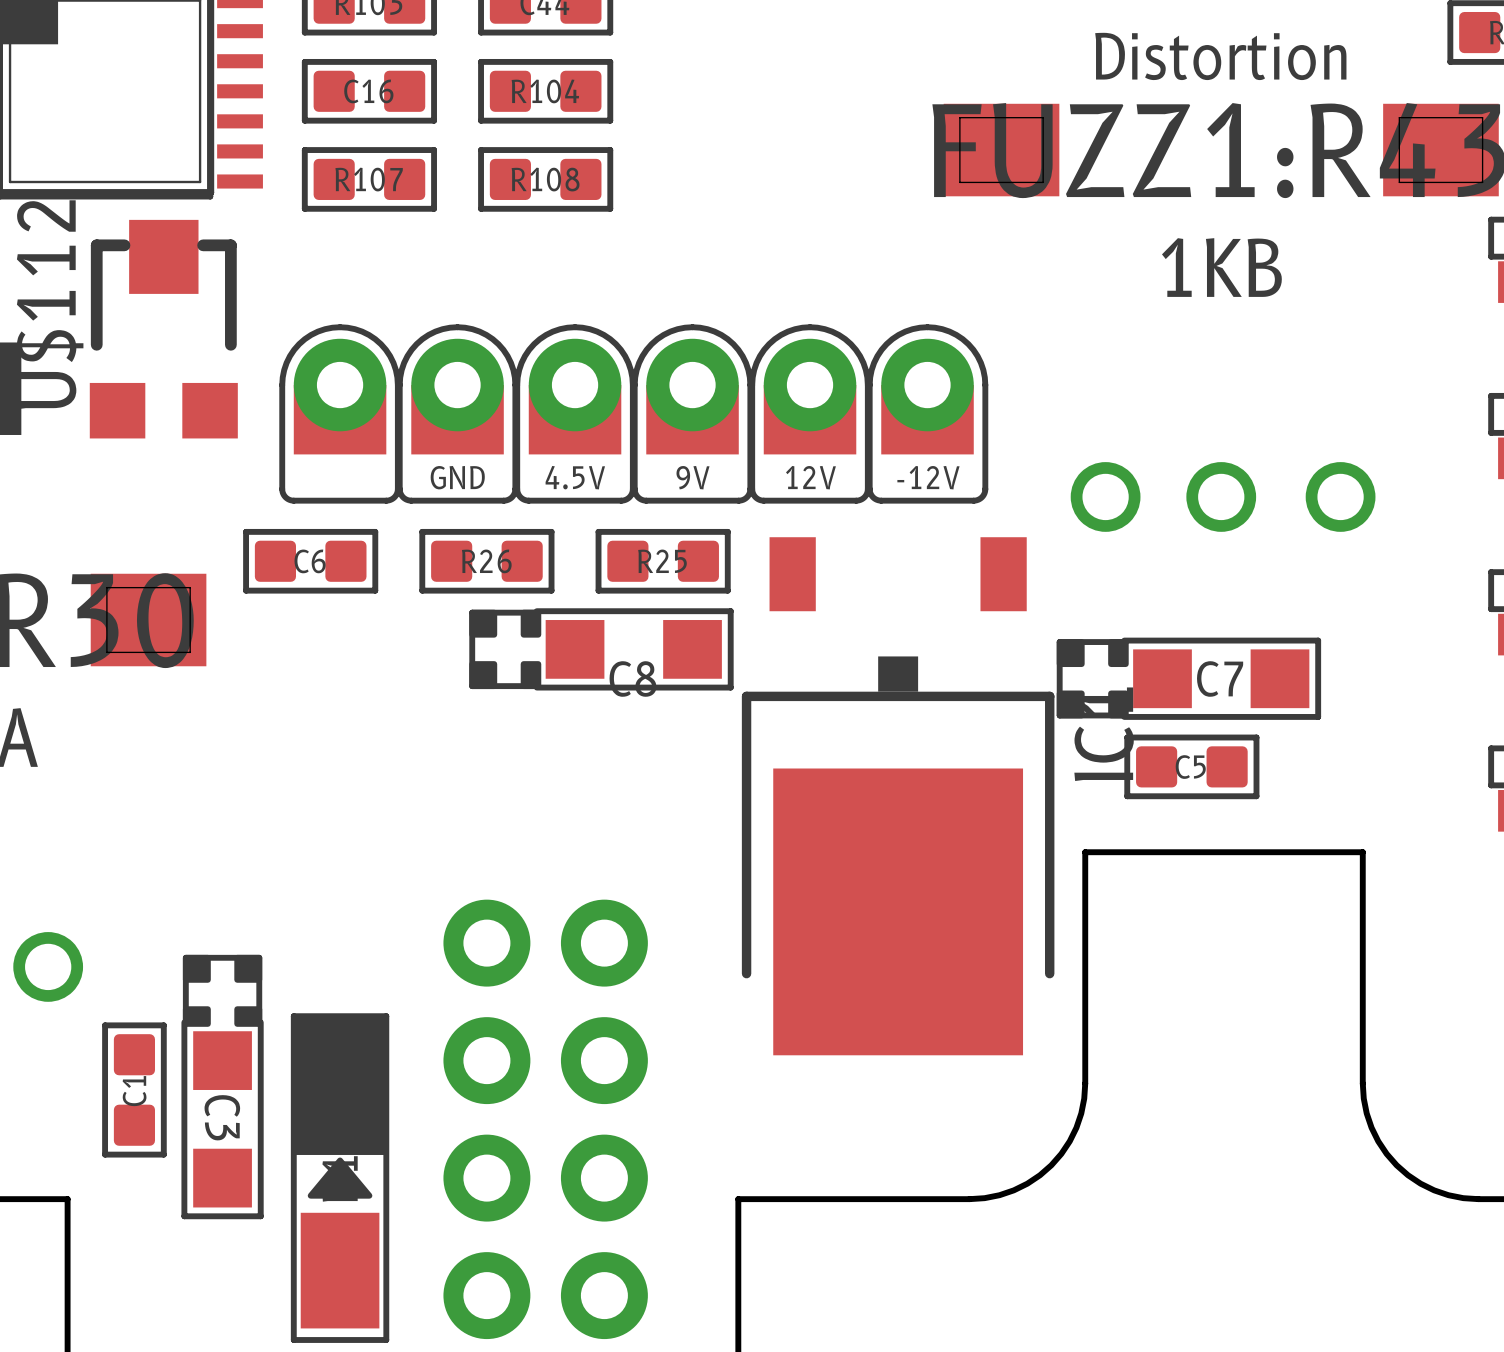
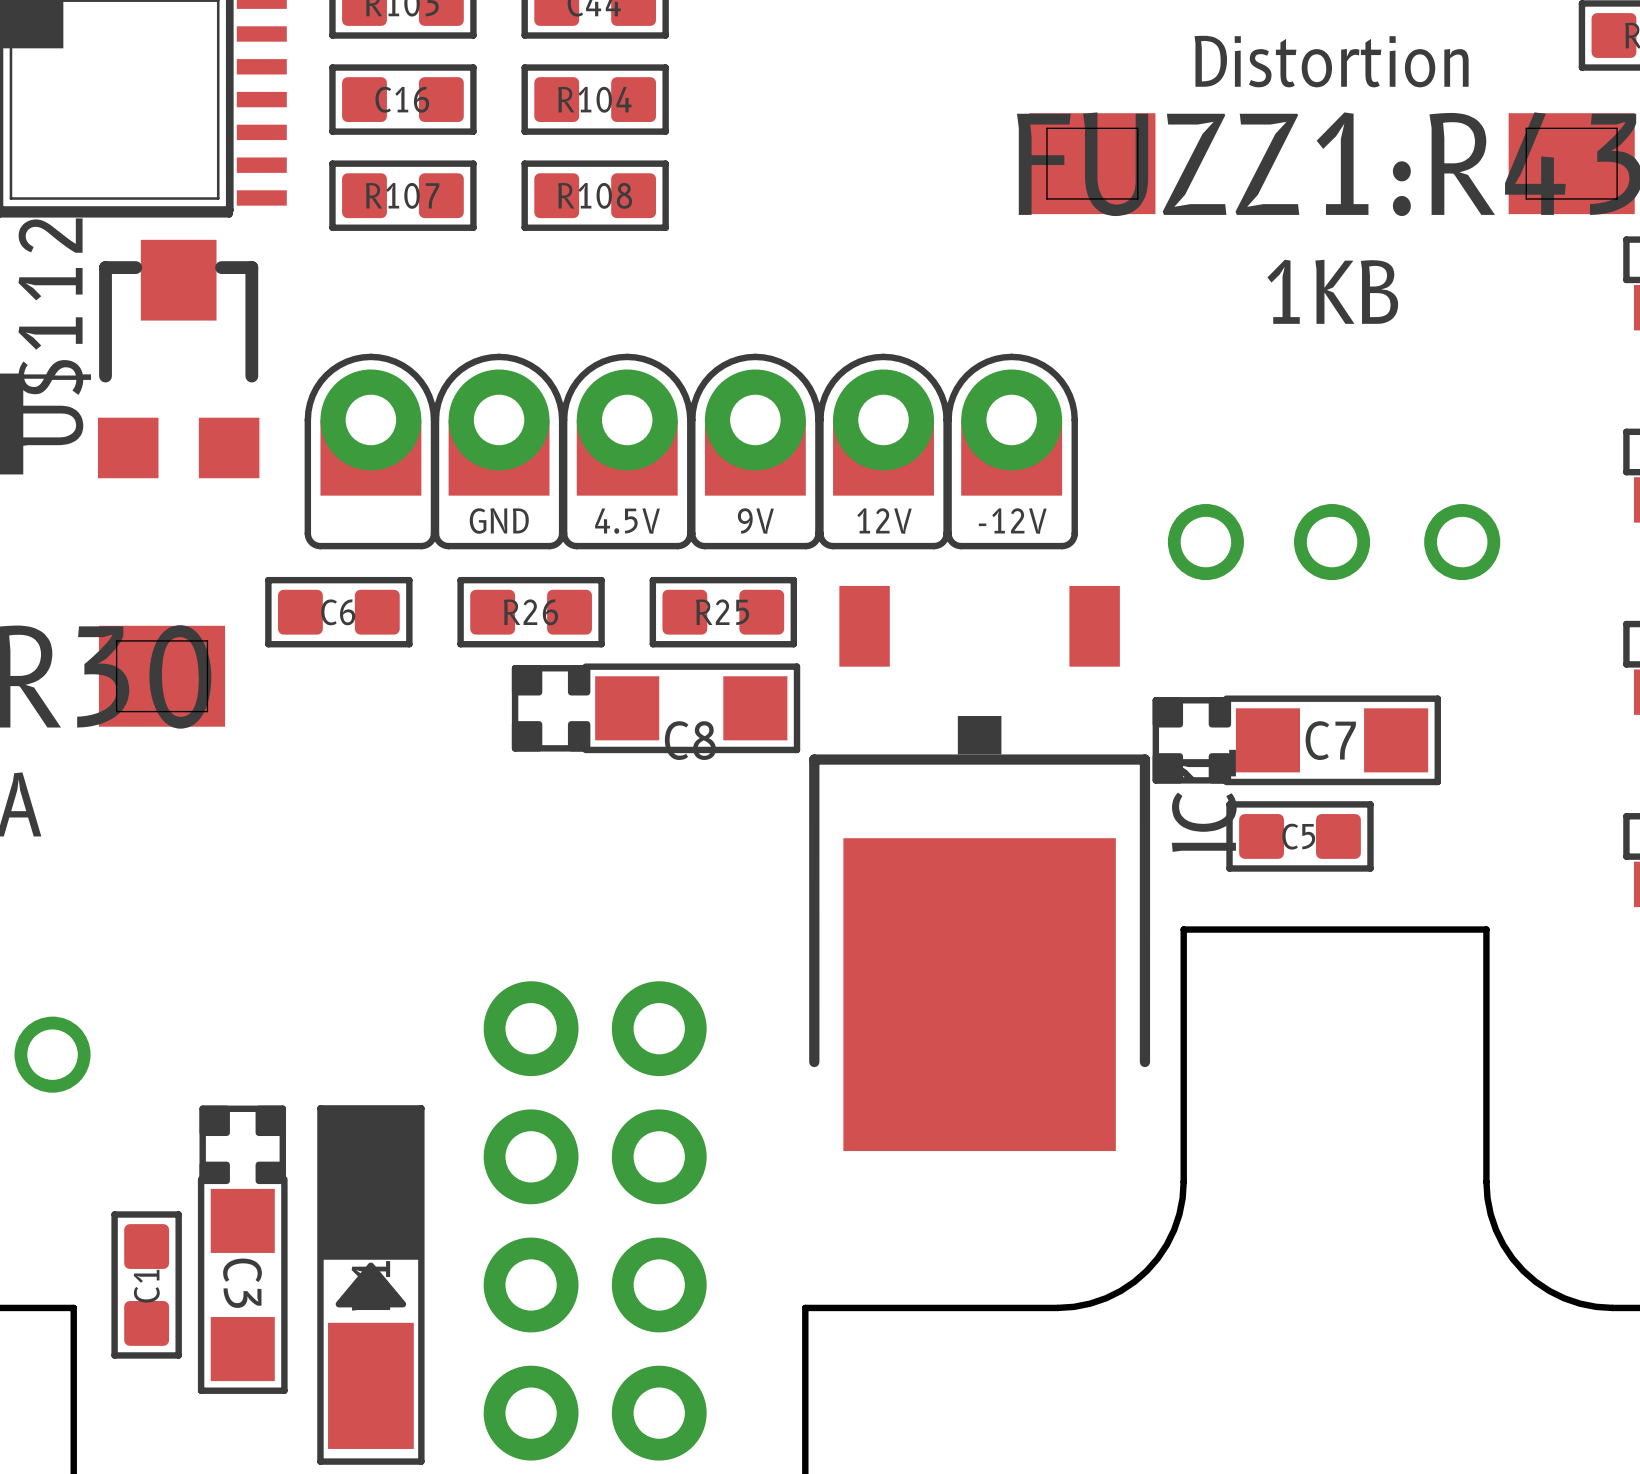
C3 position: (222, 1087) -> (242, 1249)
C1 position: (134, 1089) -> (146, 1284)

